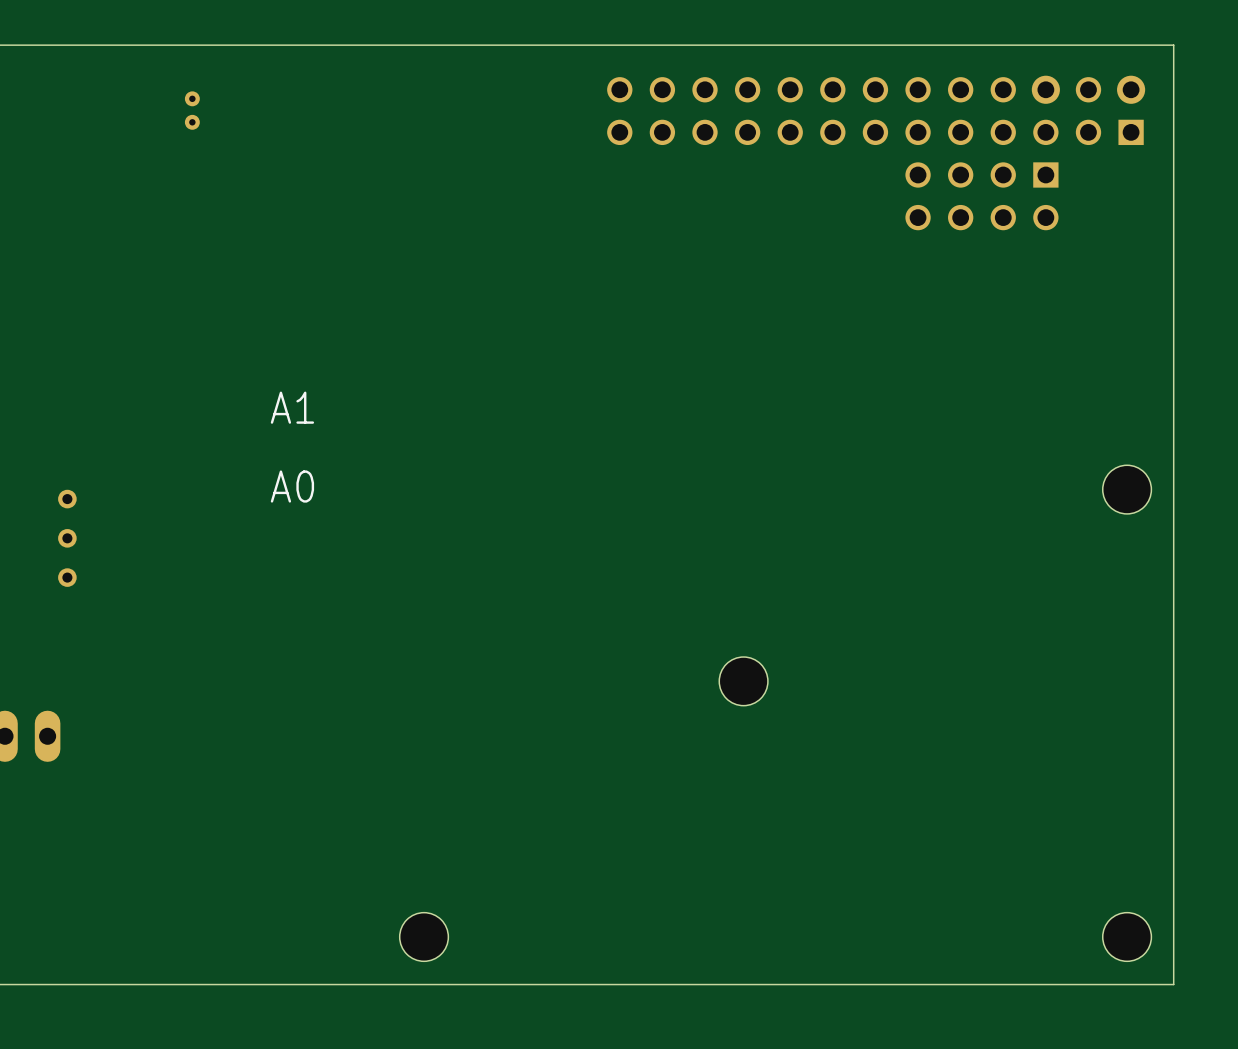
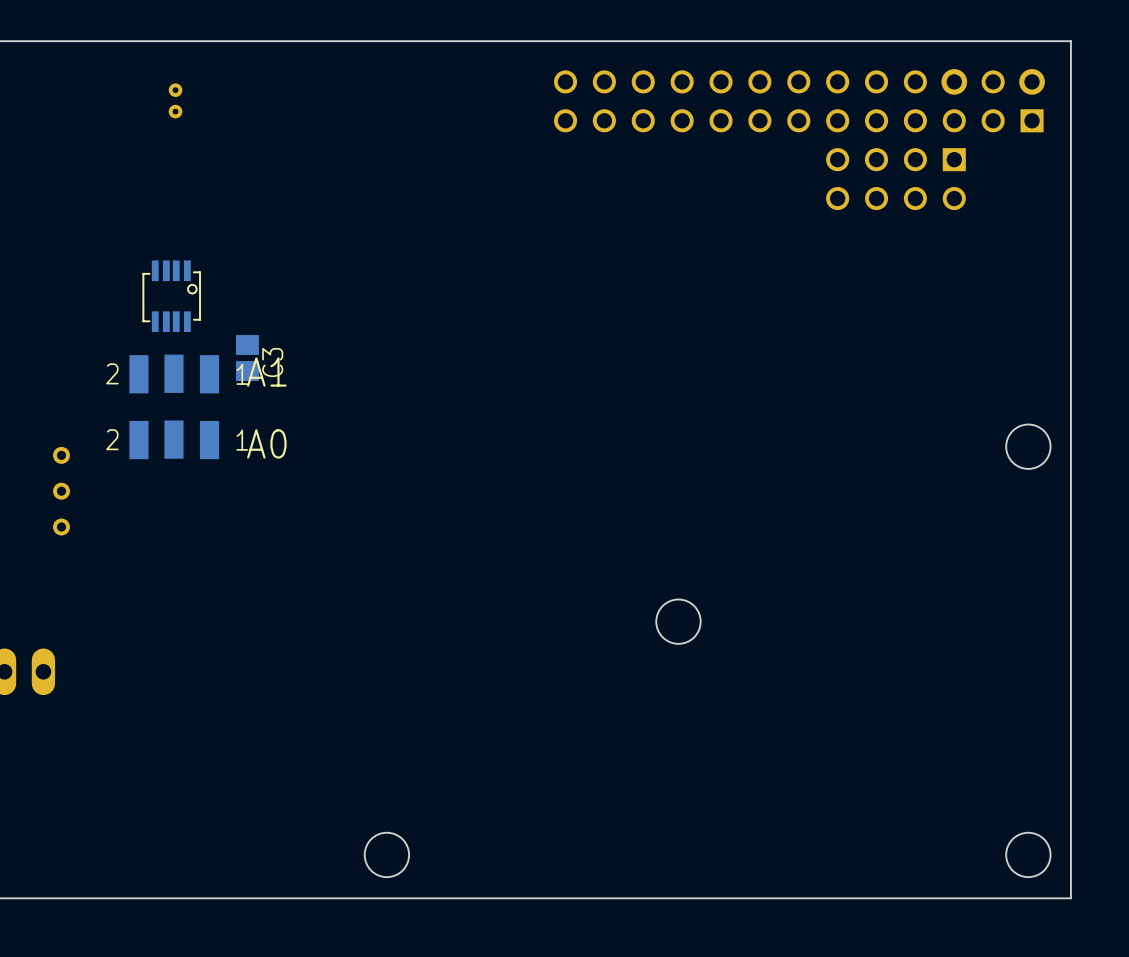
part: none -> (171, 296)
C3: none -> (247, 358)
part: none -> (174, 374)
part: none -> (174, 439)

